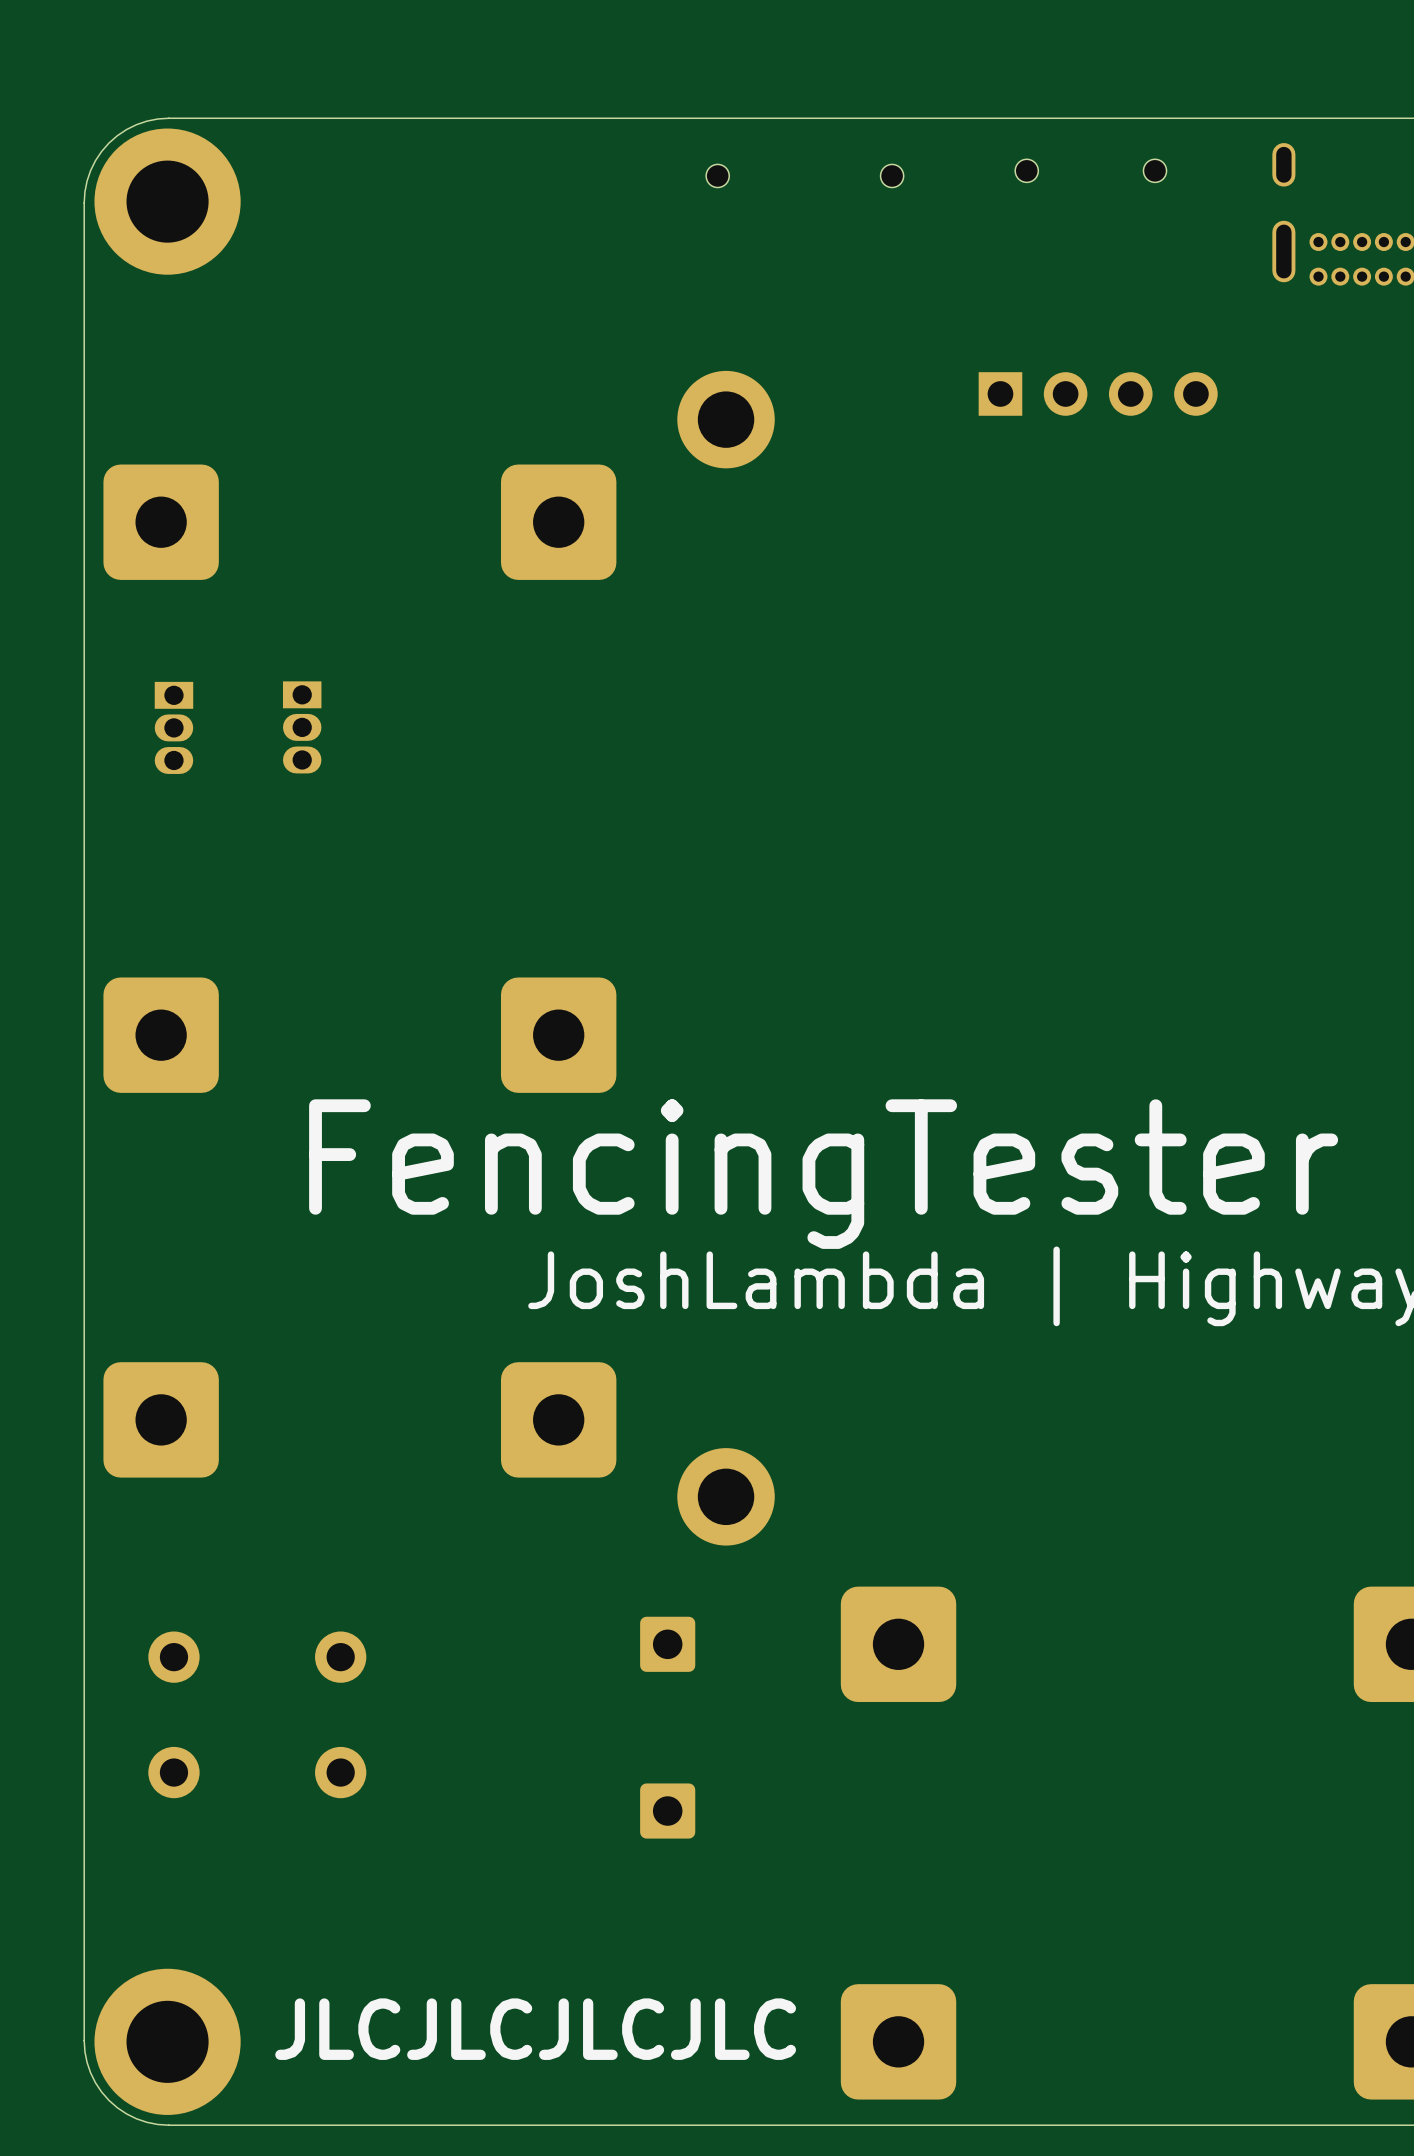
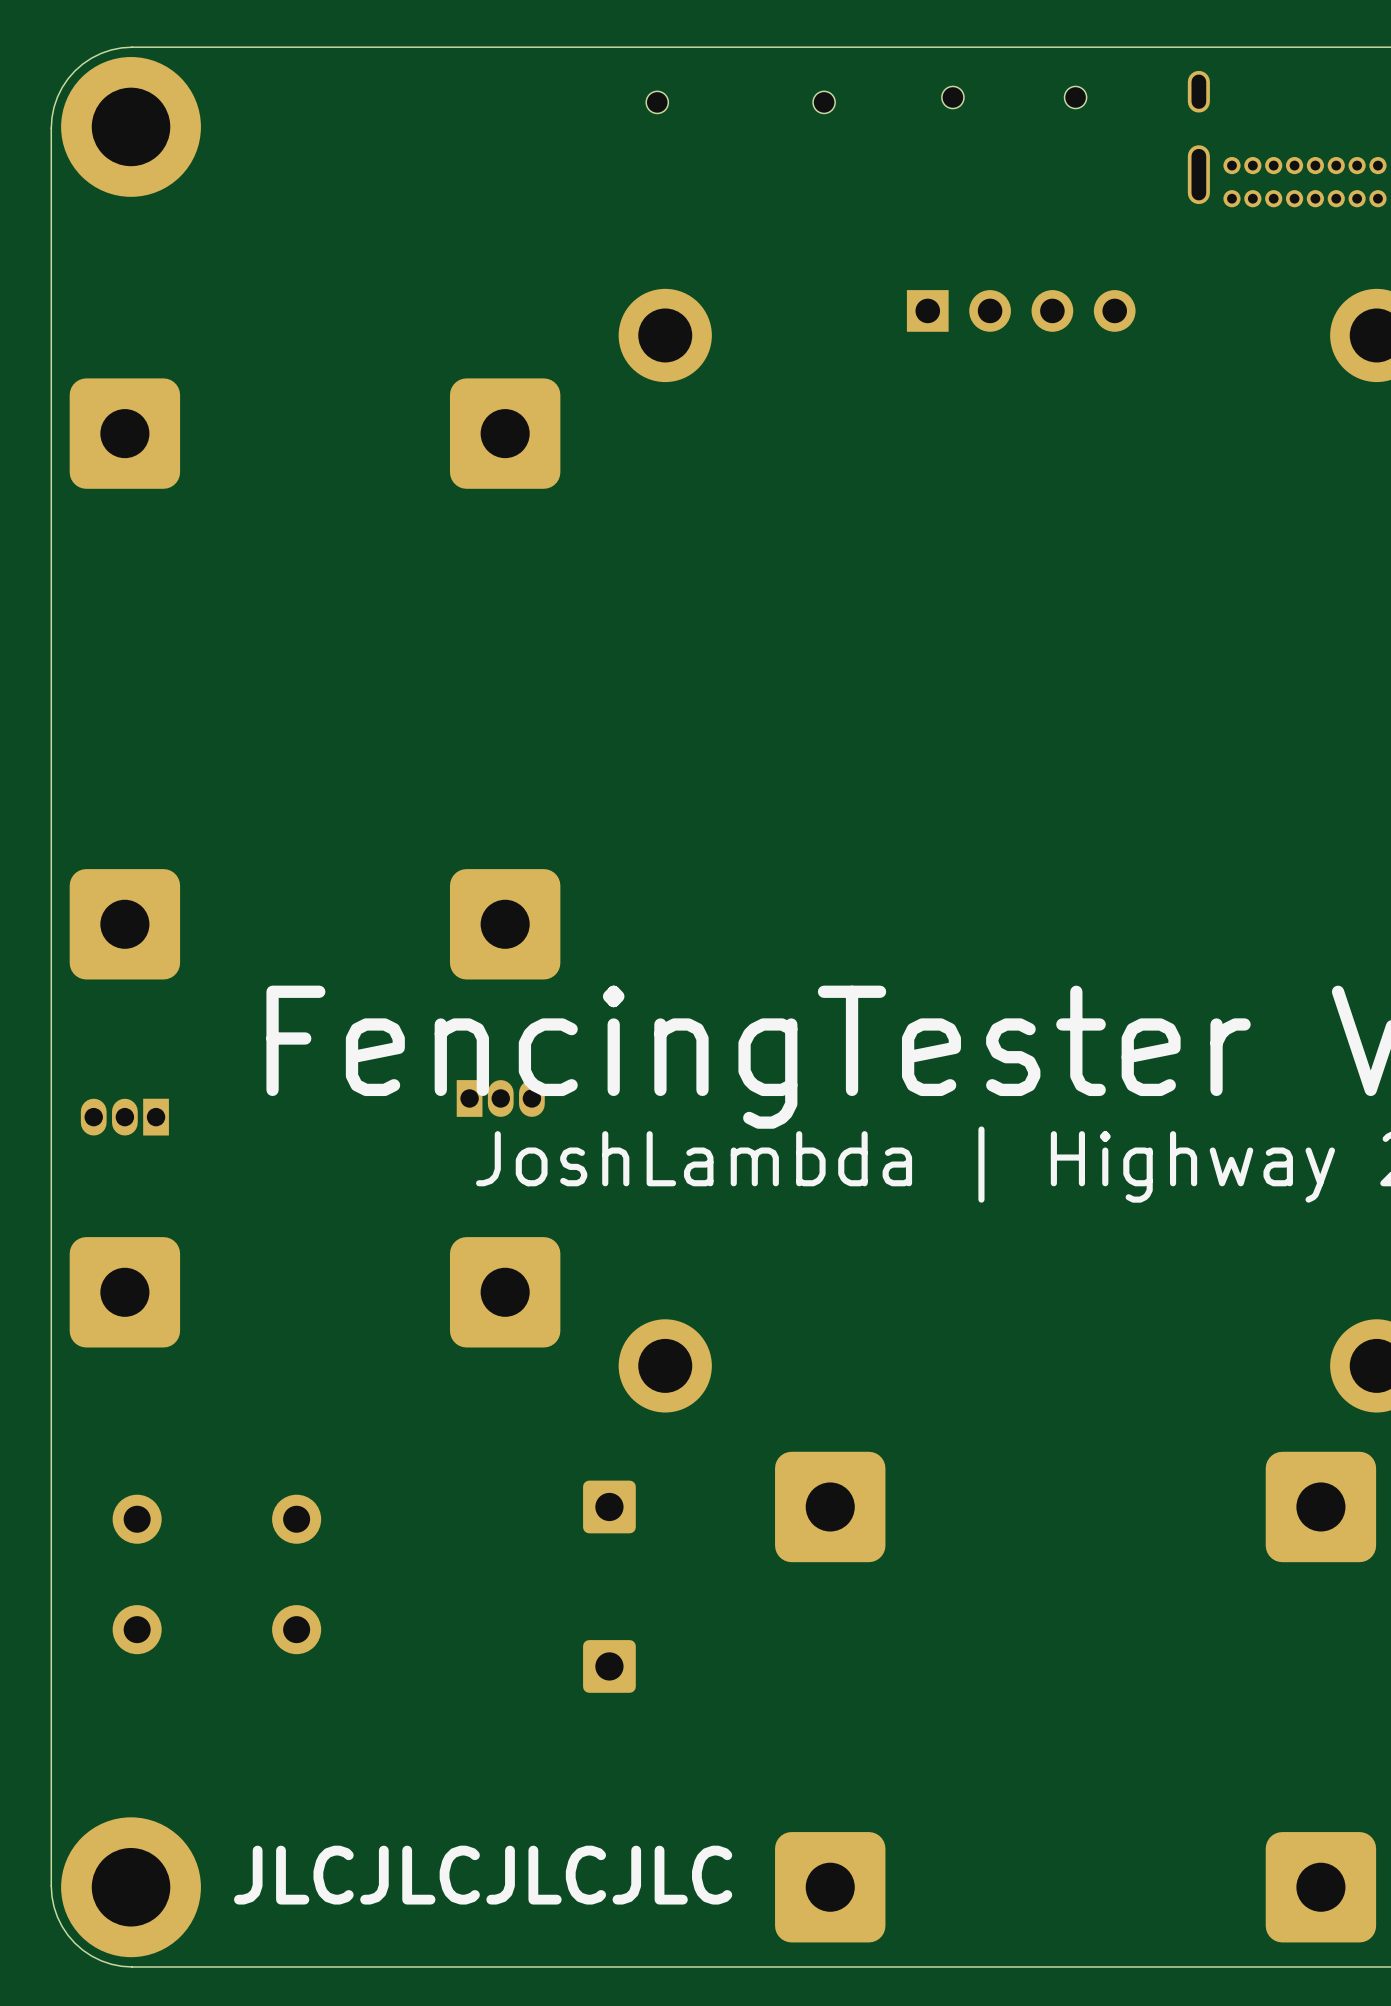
part: (173, 727) -> none
part: (302, 727) -> none
part: none -> (500, 1098)
part: none -> (124, 1117)

